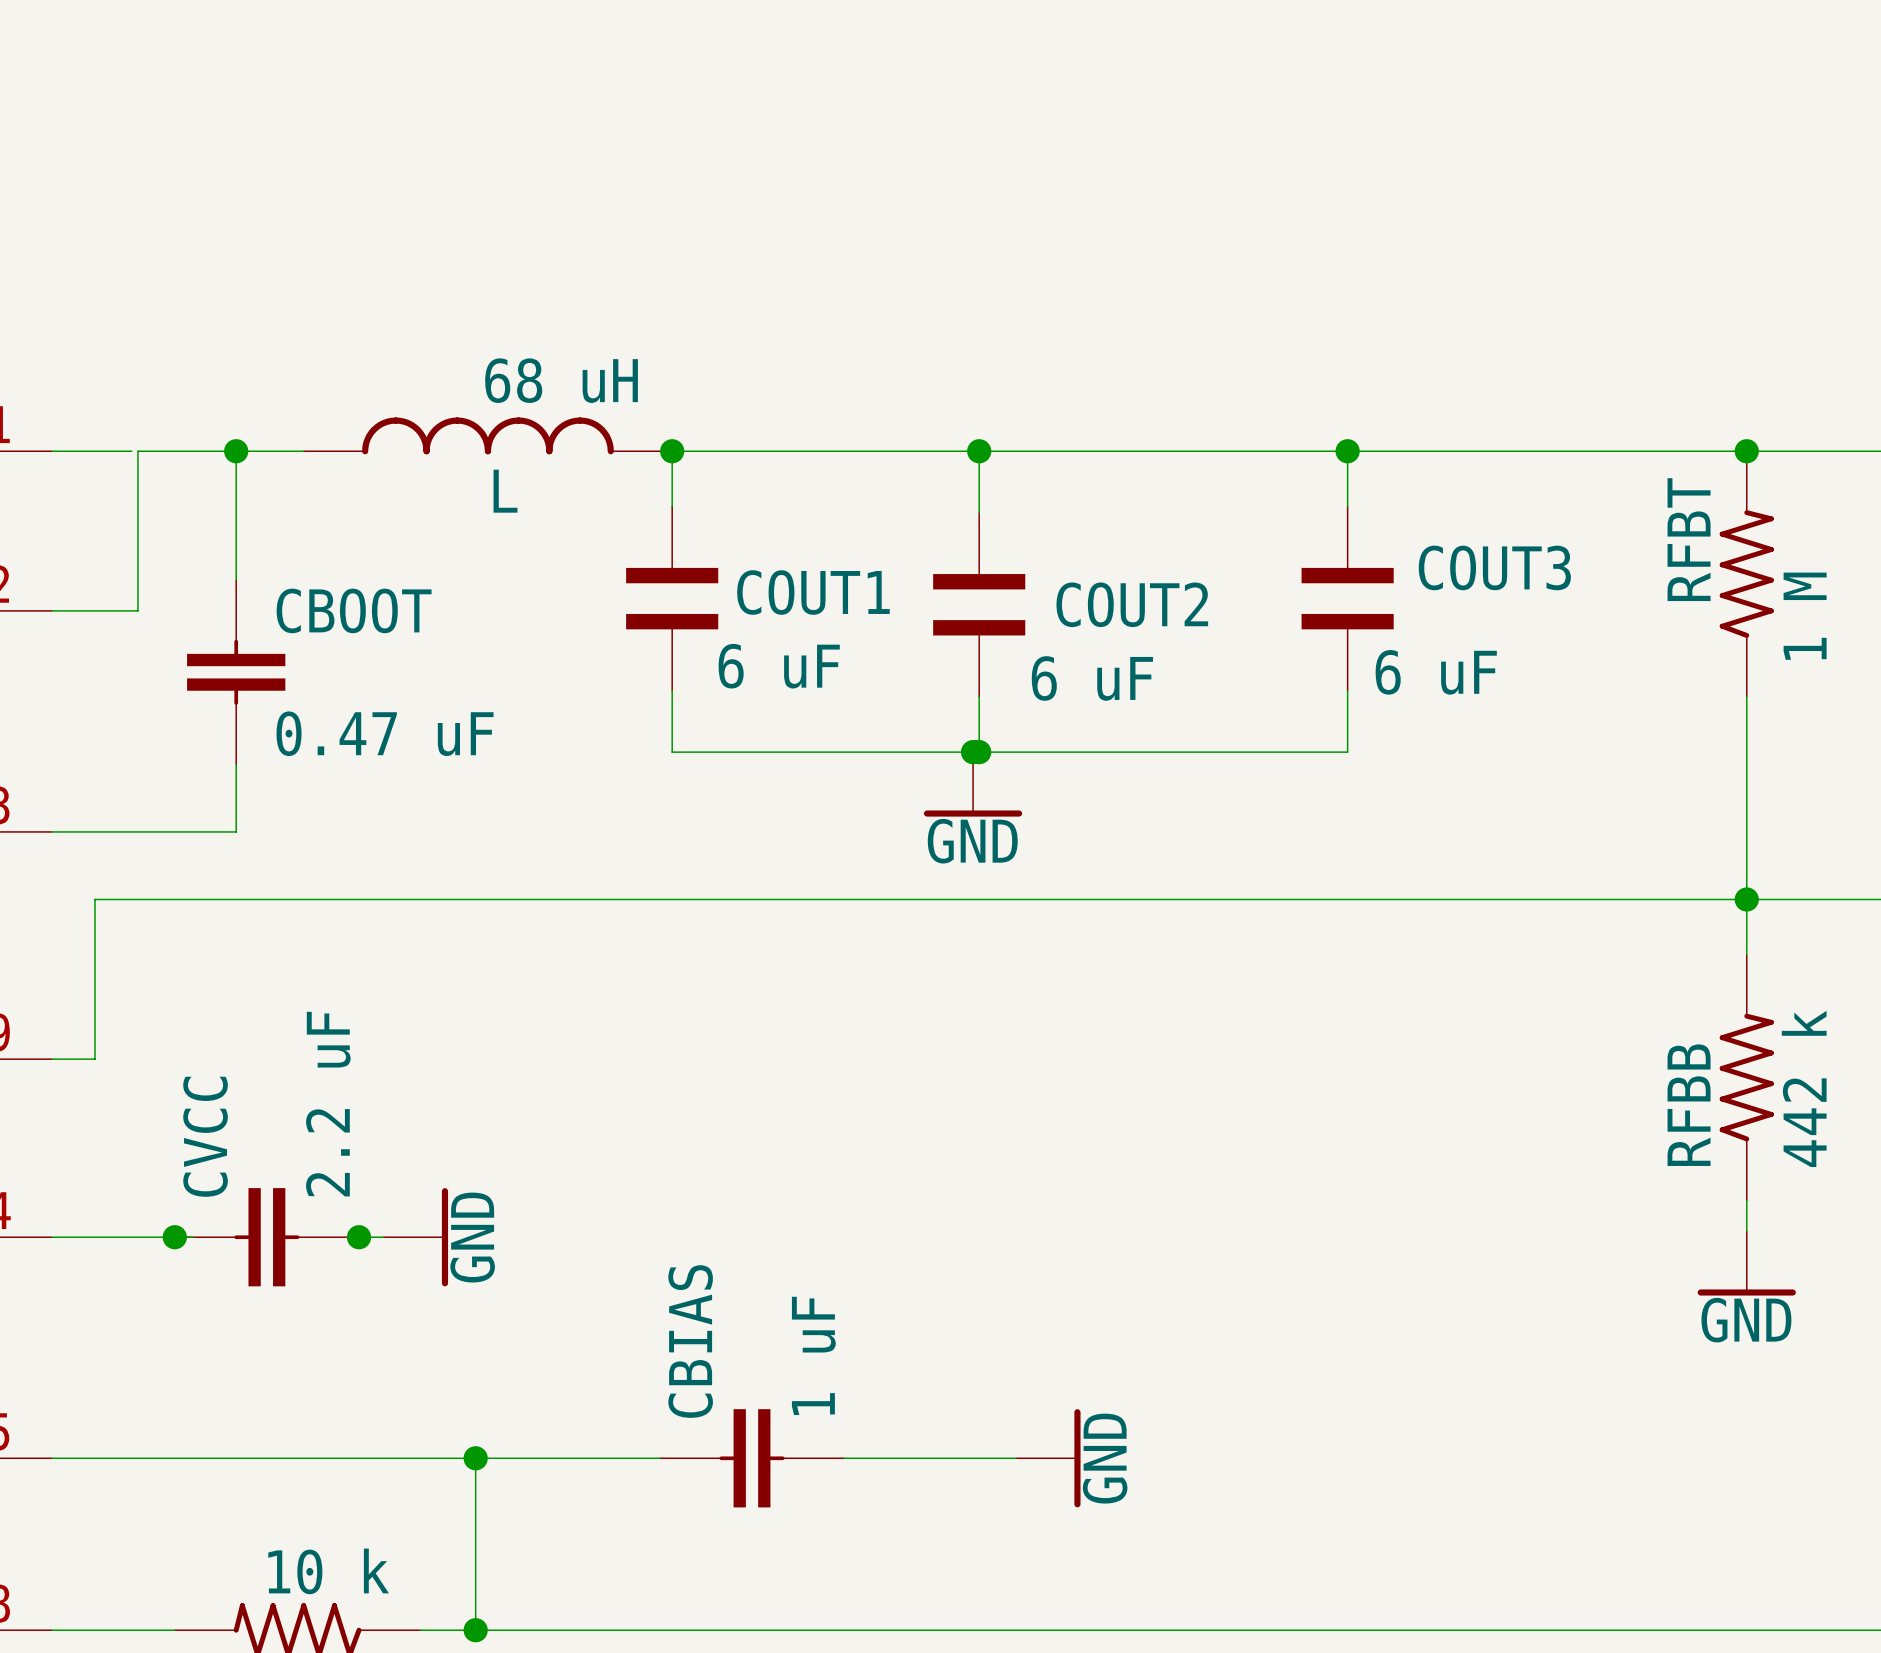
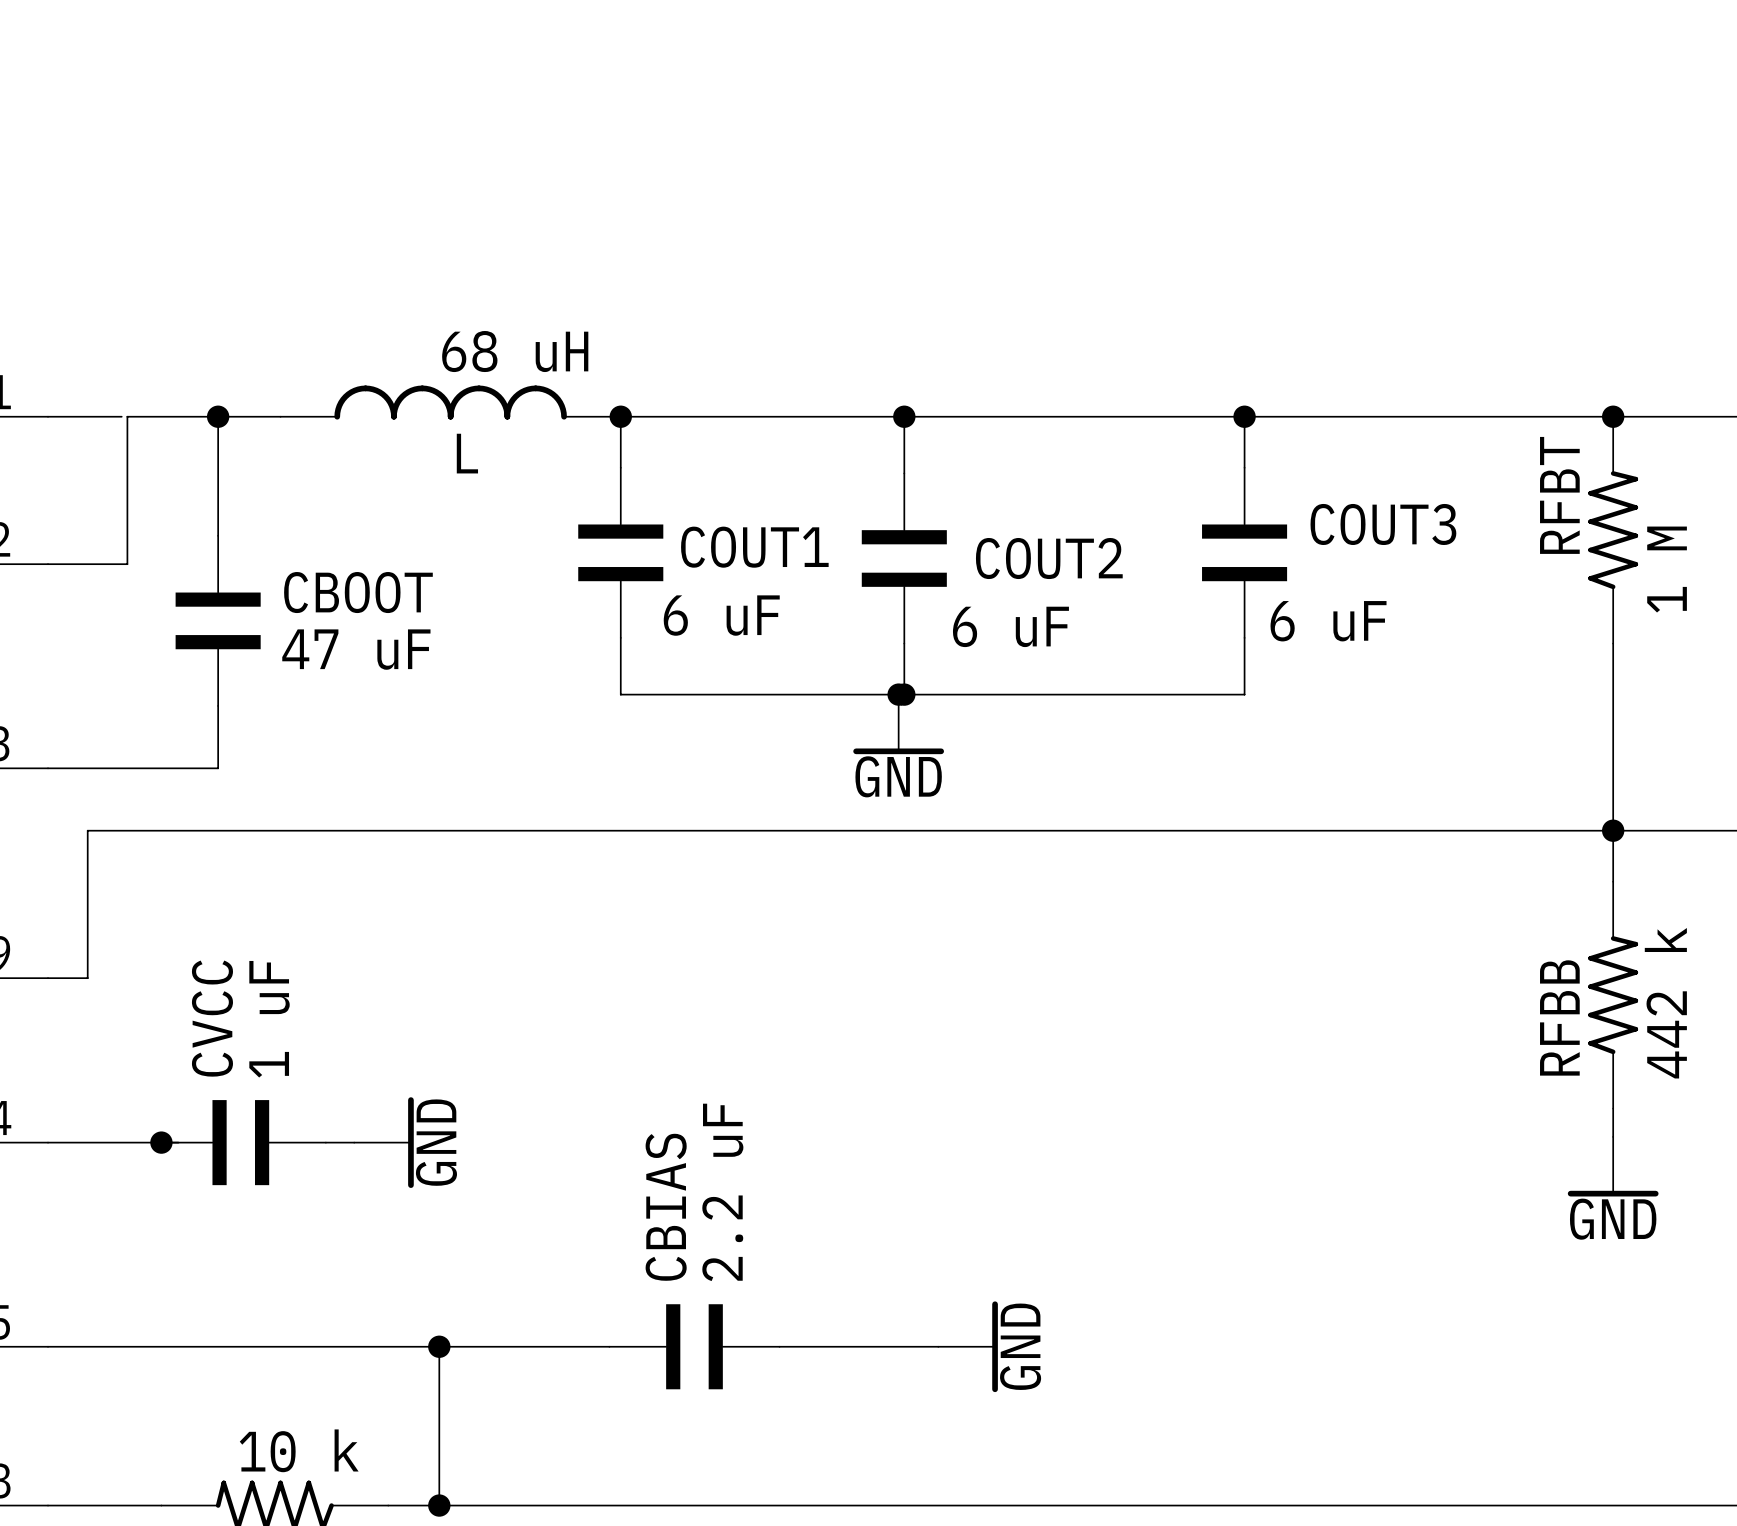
CBOOT symbol: [187, 580, 286, 765] -> [175, 535, 261, 706]
CBOOT name position: CBOOT (354, 610) -> CBOOT (358, 592)
CBOOT value: 0.47 uF (385, 733) -> 47 uF (356, 649)
CVCC value: 2.2 uF (328, 1104) -> 1 uF (269, 1019)
CVCC name position: CVCC (205, 1136) -> CVCC (212, 1018)
CVCC symbol: [174, 1188, 360, 1287] -> [155, 1100, 326, 1186]
junction: (359, 1237) -> none
CBIAS name position: CBIAS (690, 1341) -> CBIAS (666, 1207)
CBIAS value: 1 uF (813, 1355) -> 2.2 uF (722, 1192)
CBIAS symbol: [659, 1409, 845, 1508] -> [609, 1304, 780, 1390]

